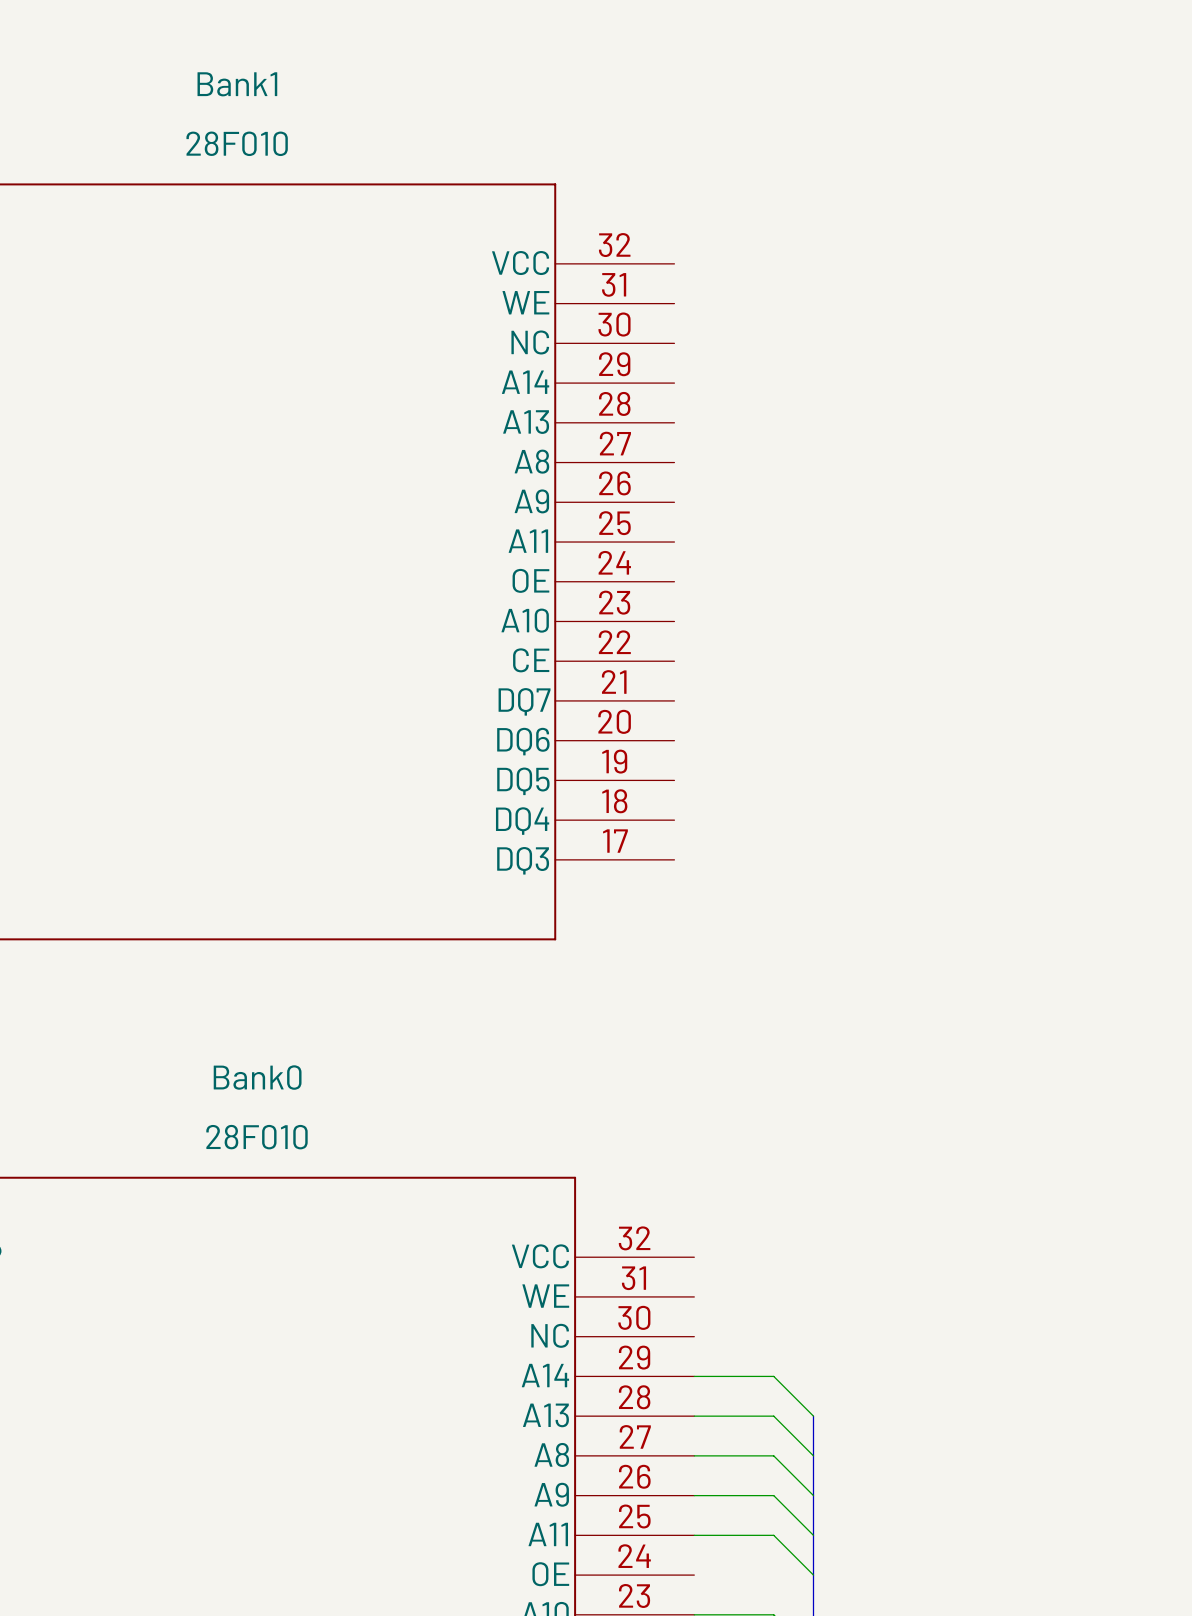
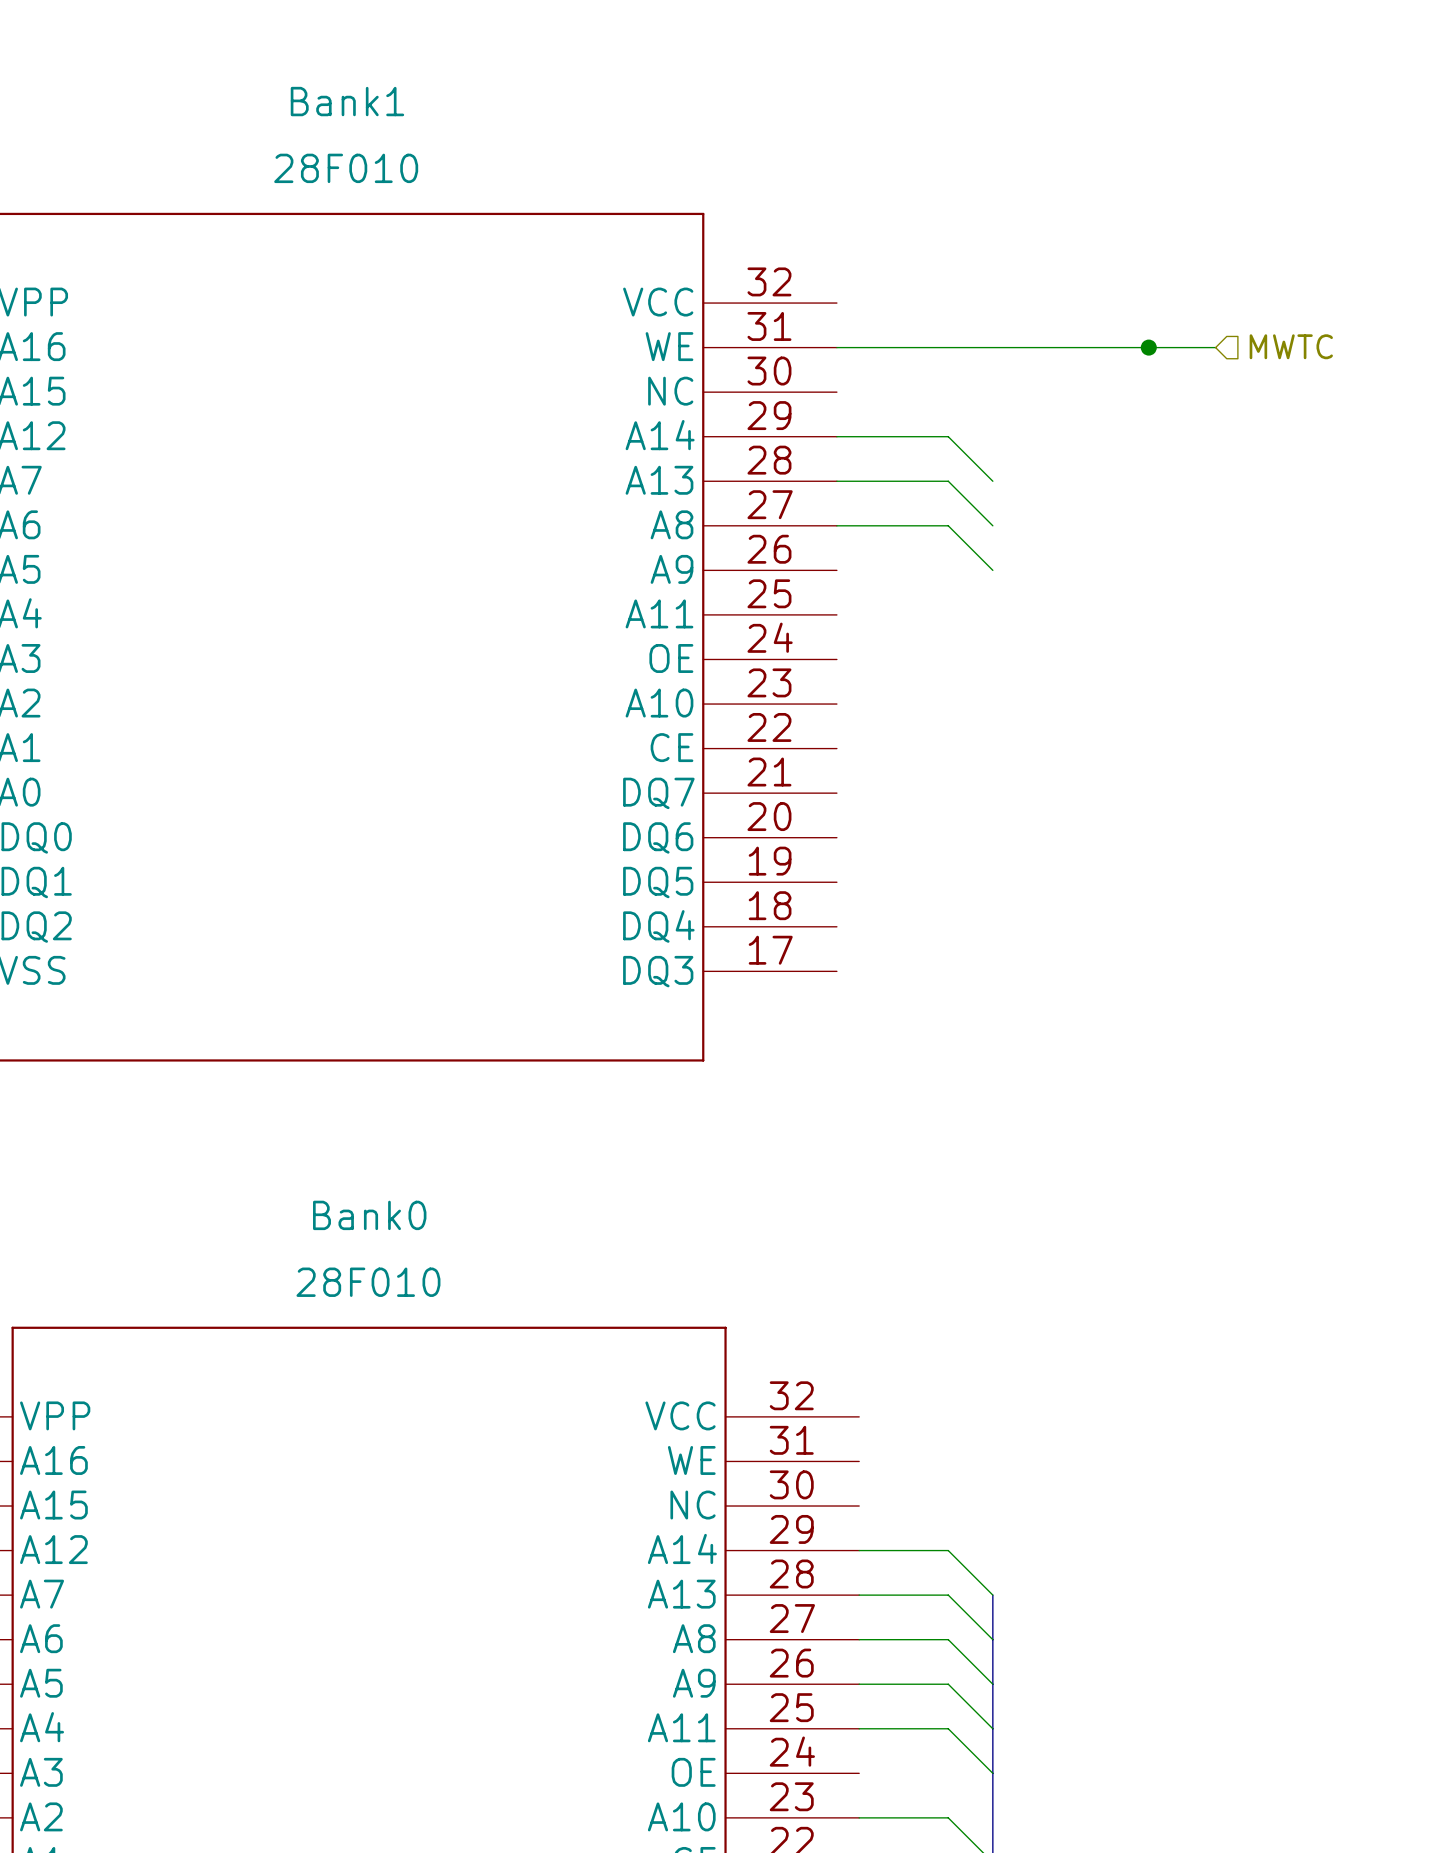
hierarchical label: none -> MWTC (1291, 346)
wire: none -> (836, 347) (1215, 347)
junction: none -> (1148, 347)
wire: none -> (836, 436) (948, 436) (992, 481)
wire: none -> (836, 481) (948, 481) (992, 525)
wire: none -> (836, 525) (948, 525) (992, 570)

